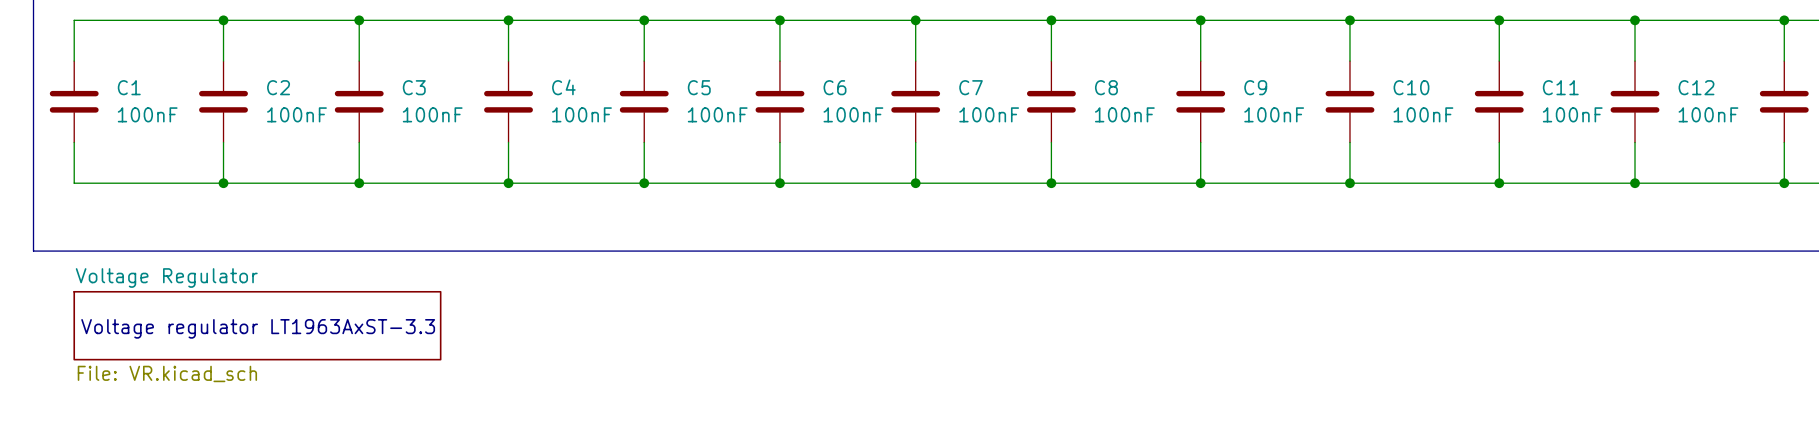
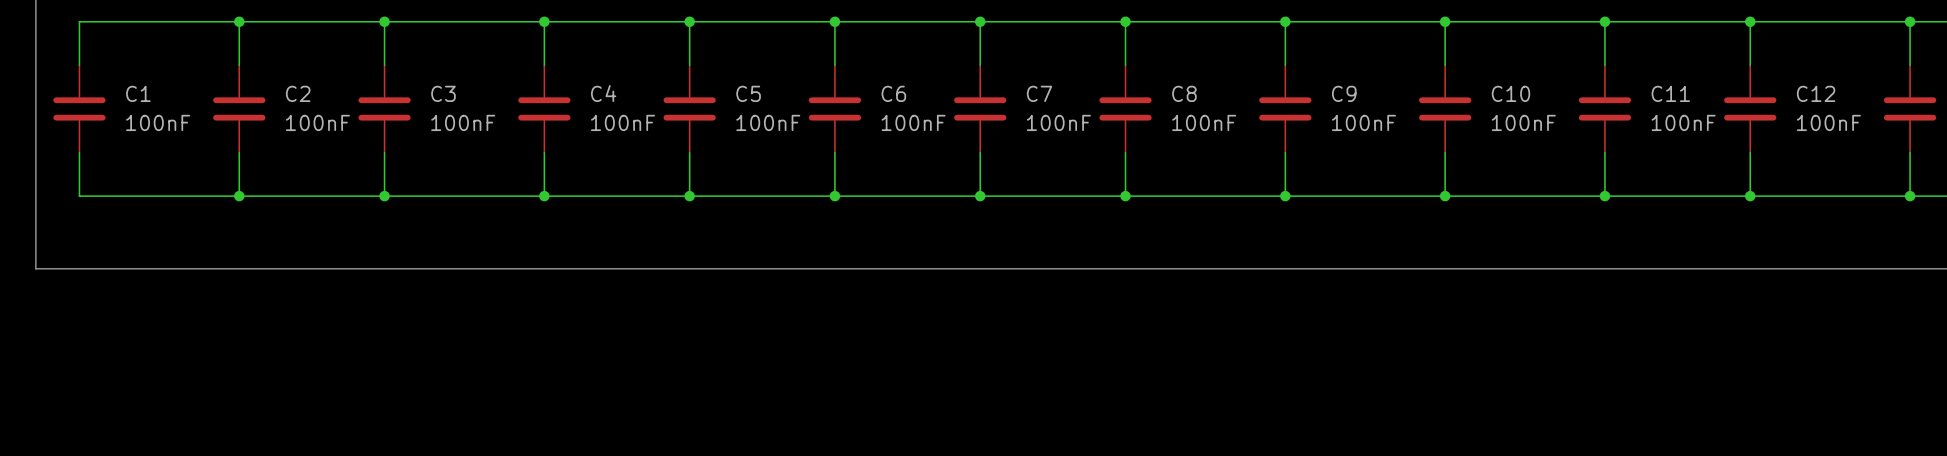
sheet Voltage Regulator: File: VR.kicad_sch (257, 325) -> none
text: Voltage regulator LT1963AxST-3.3 (258, 328) -> none

